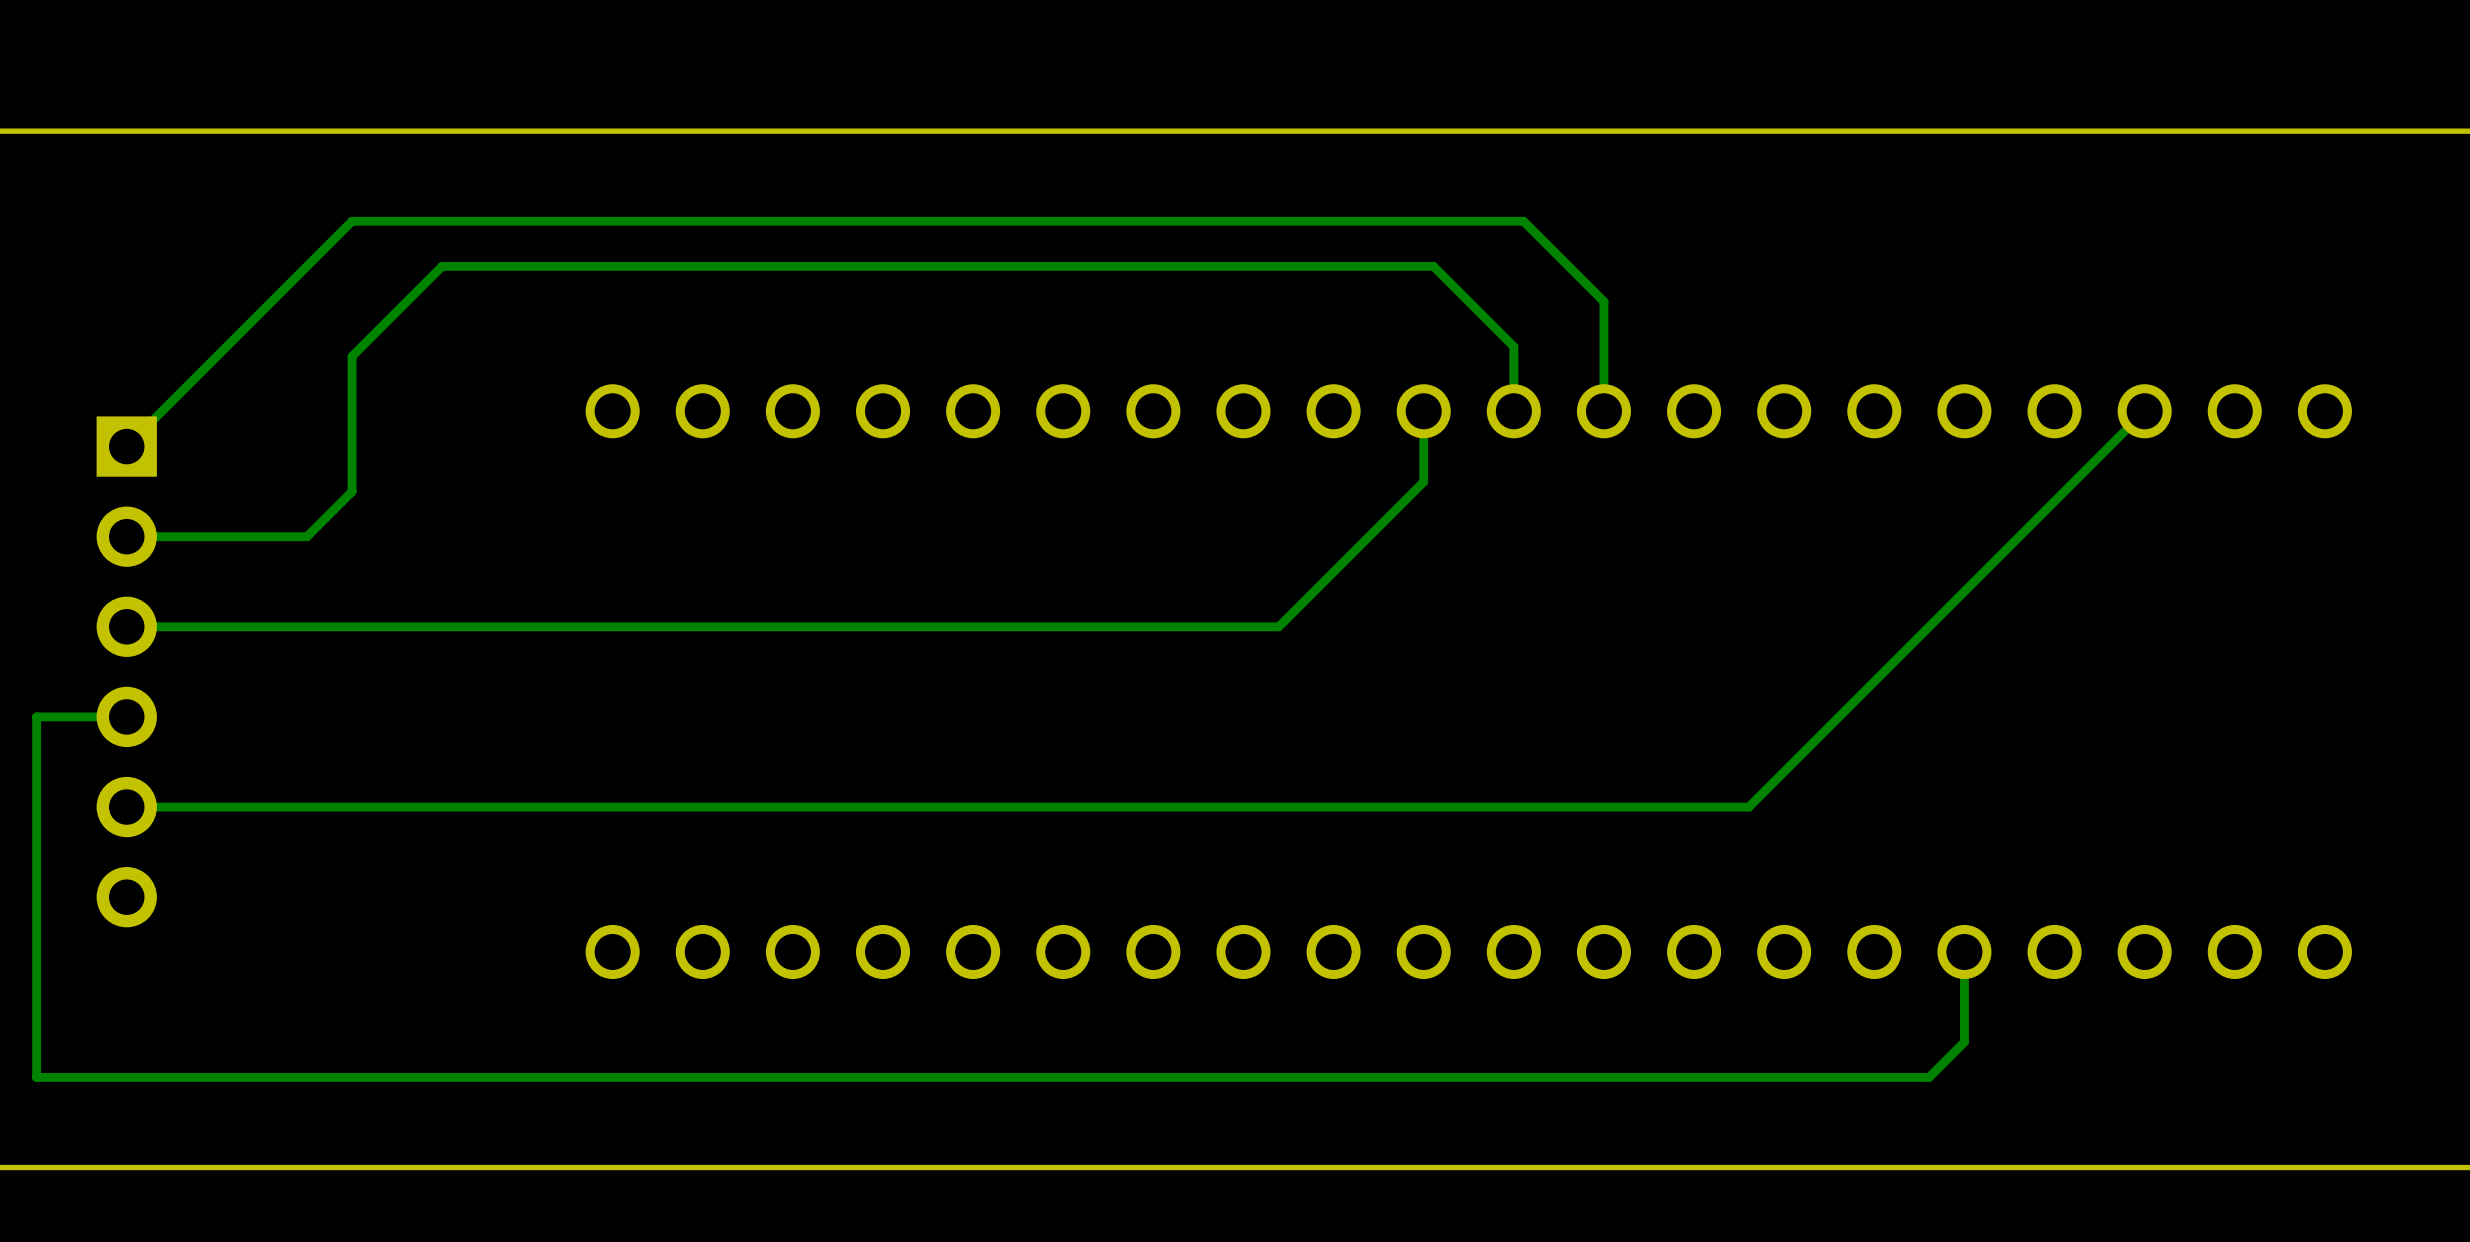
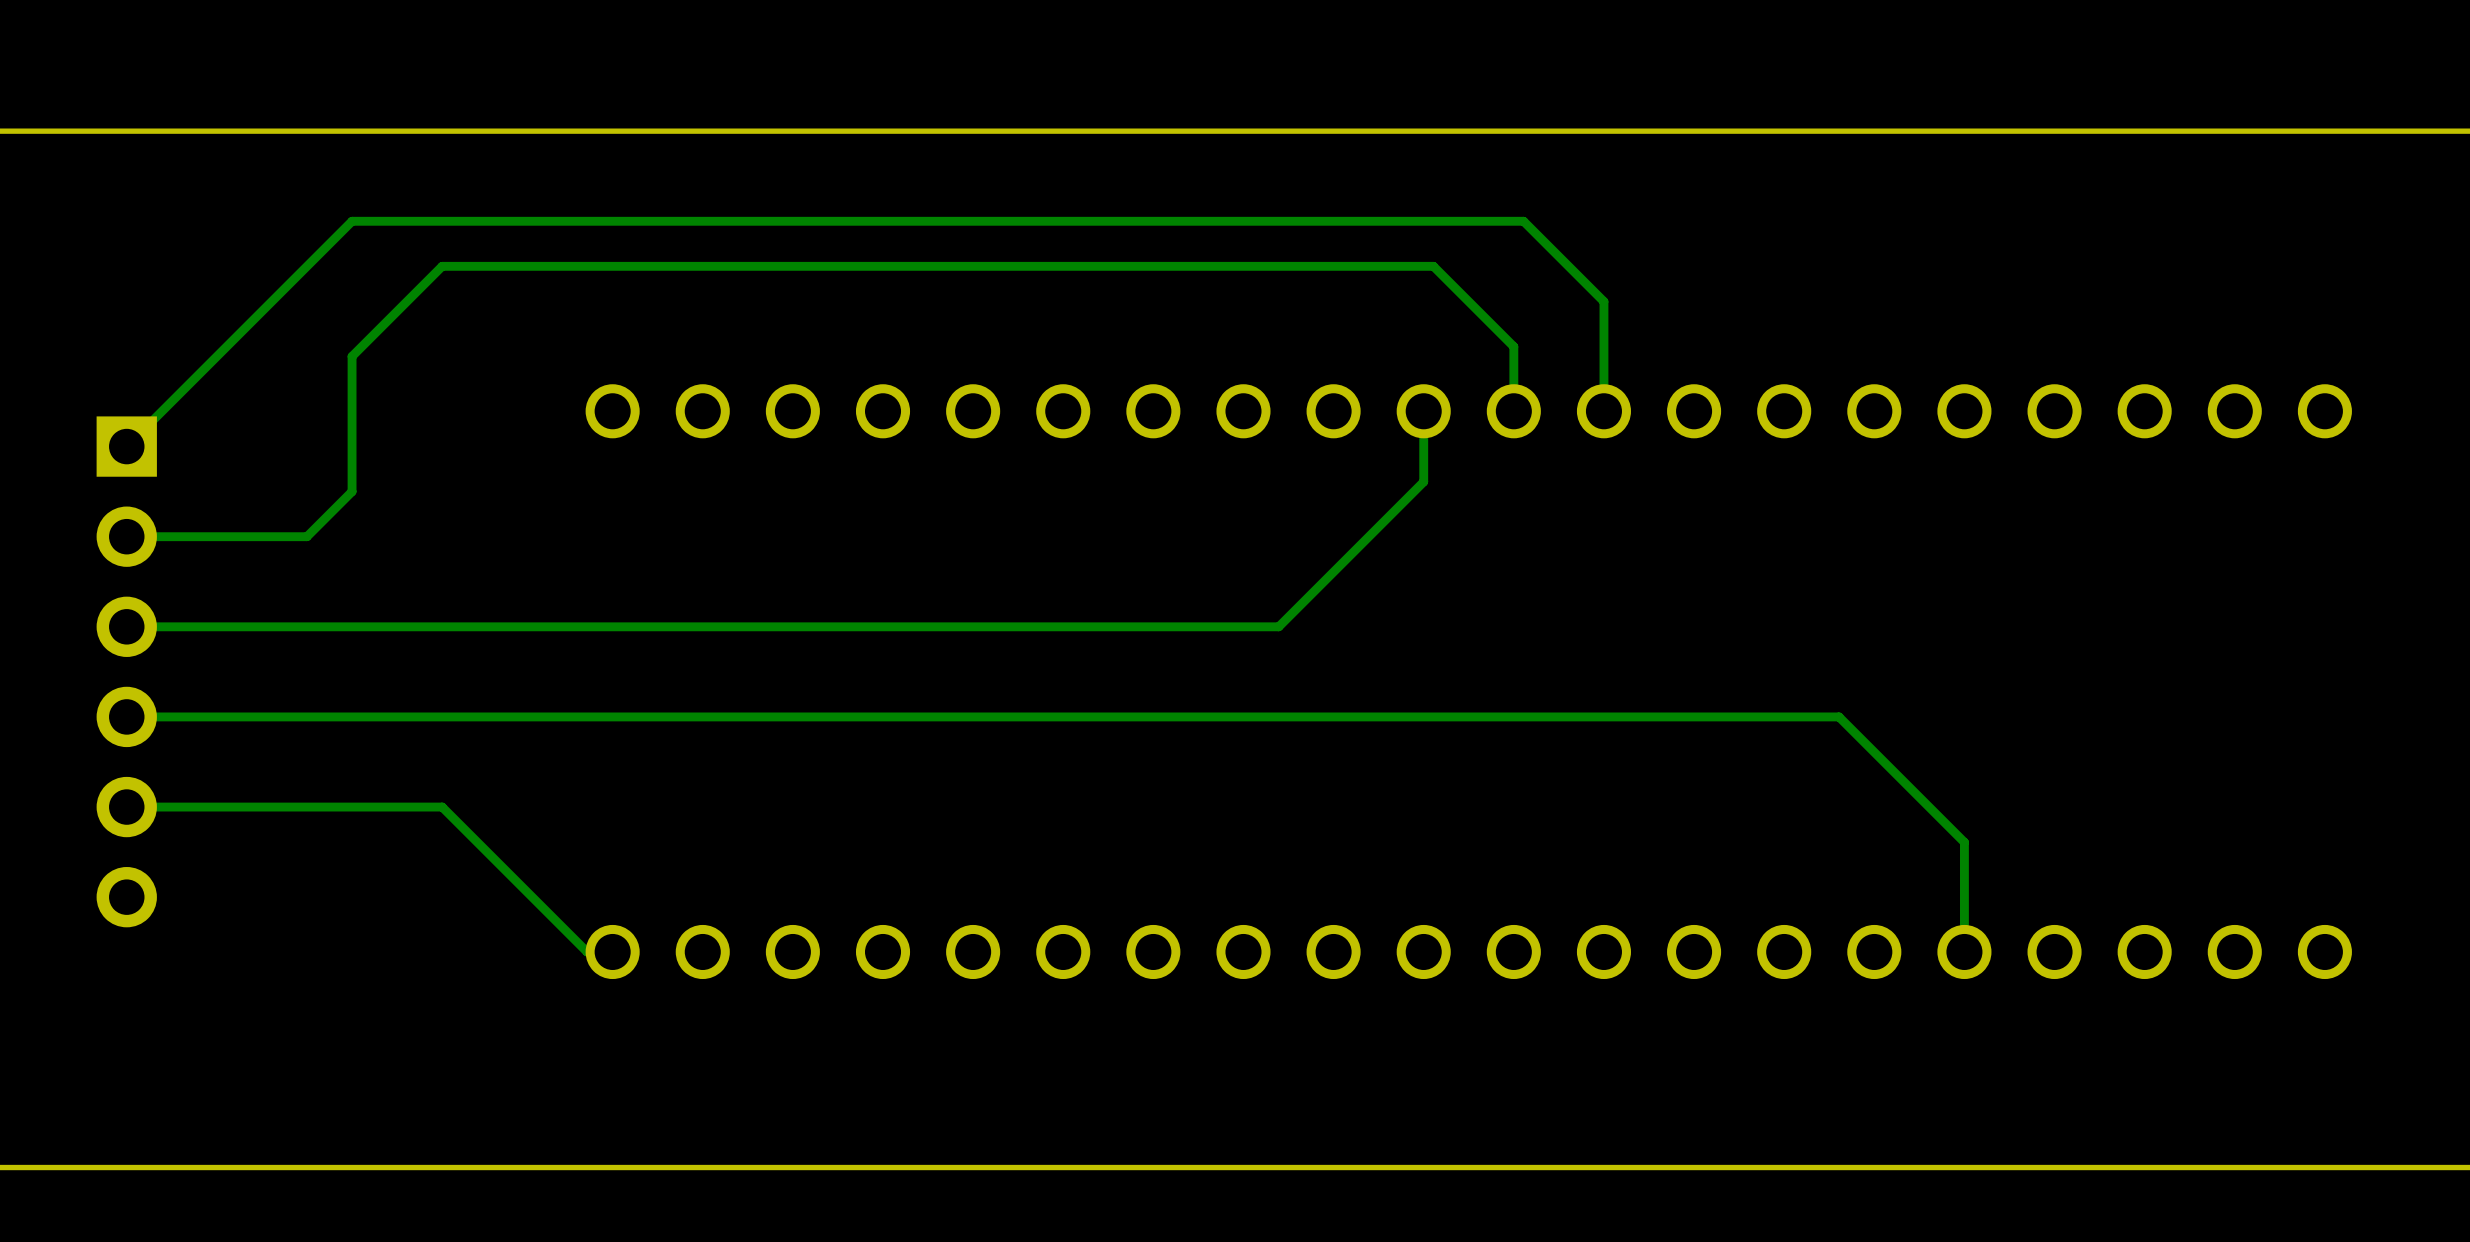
track: (2144, 411) (1748, 807) (442, 807) -> (612, 951) (587, 951) (442, 807)
track: (126, 716) (36, 716) (36, 1077) (1929, 1077) (1964, 1042) (1964, 951) -> (126, 716) (1839, 716) (1964, 842) (1964, 951)

